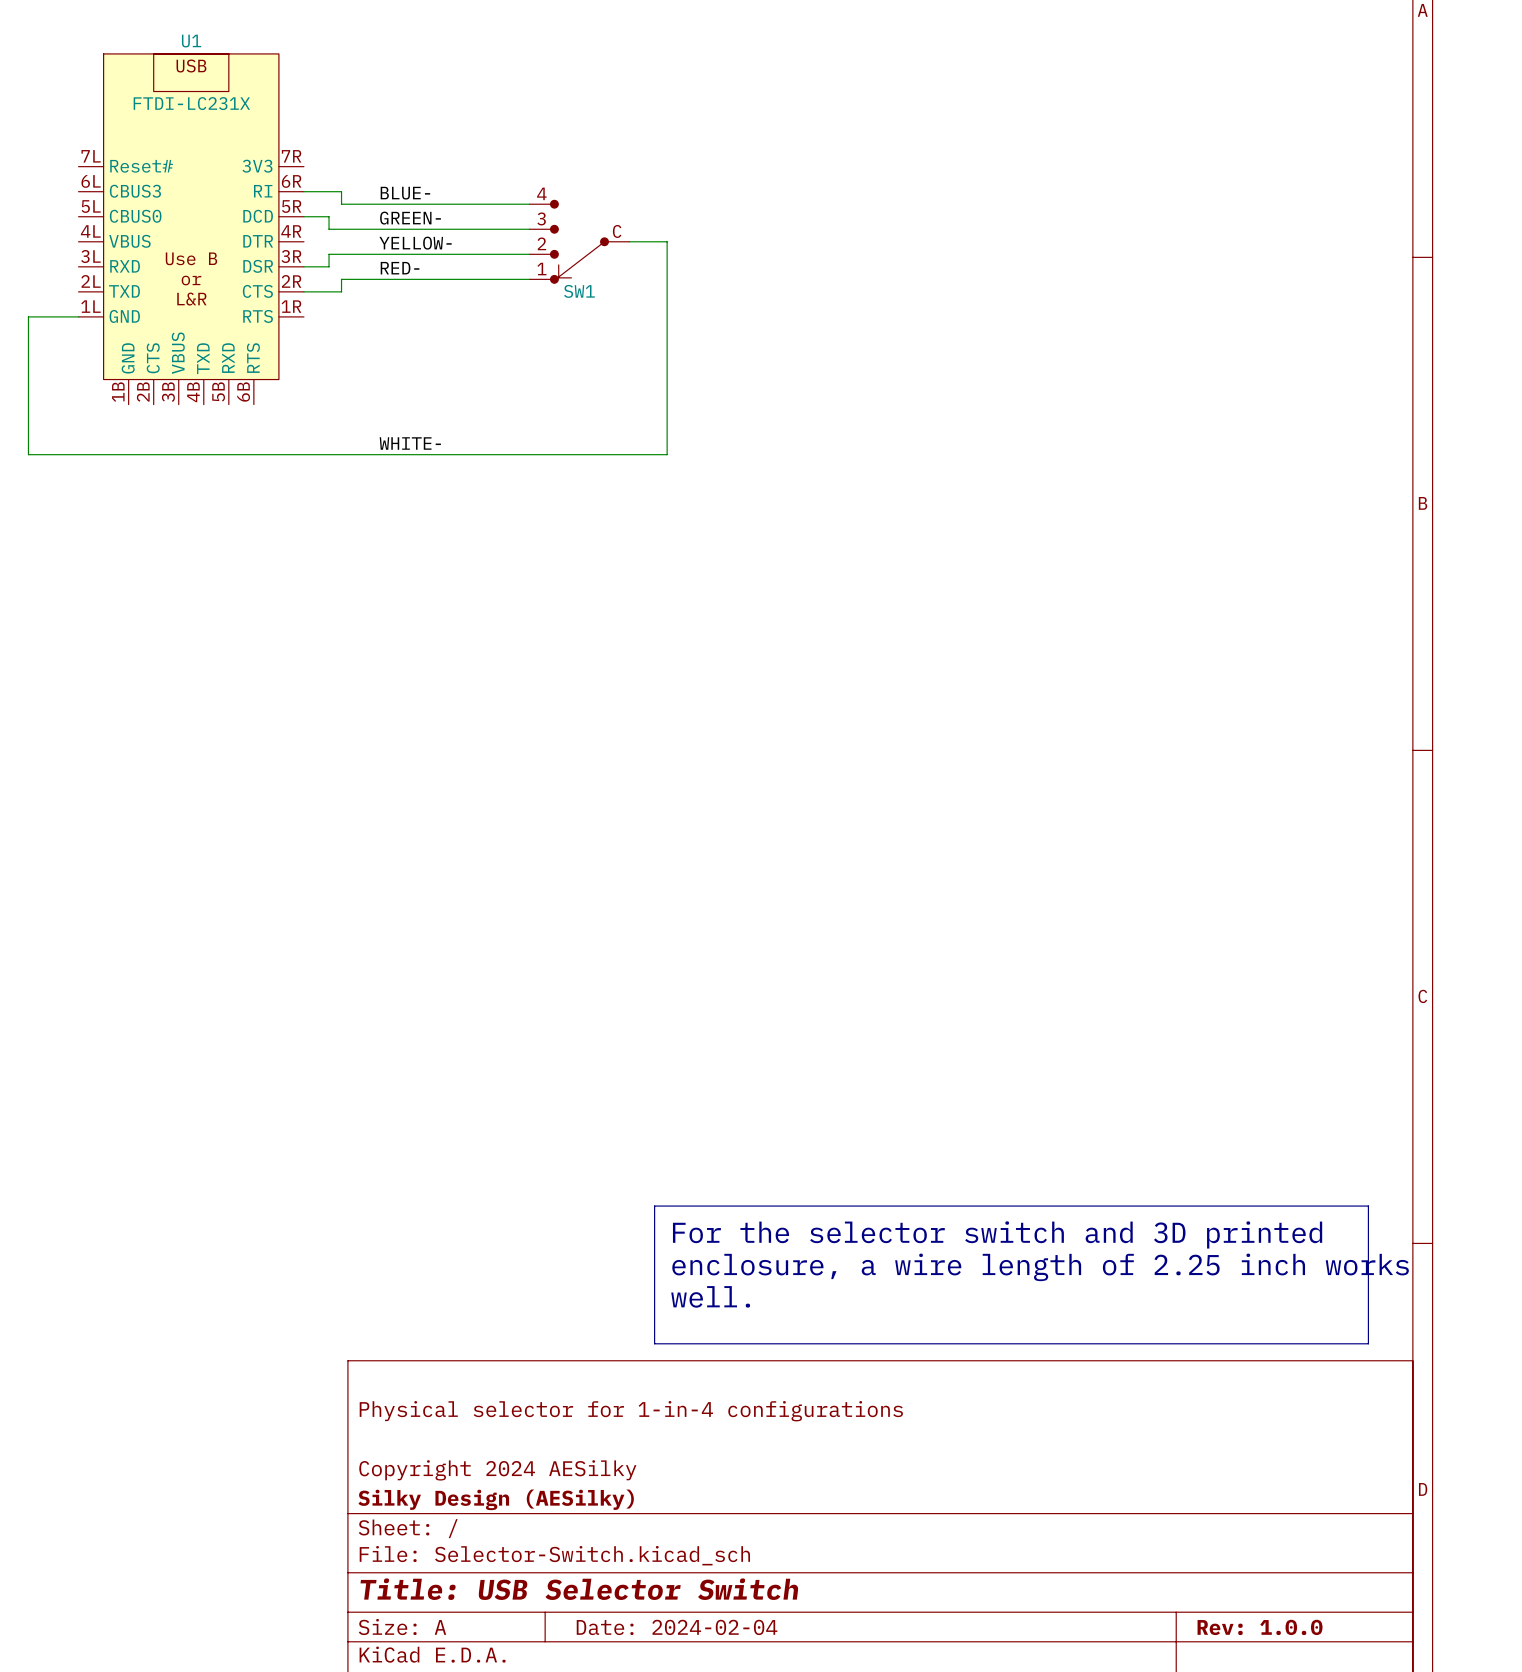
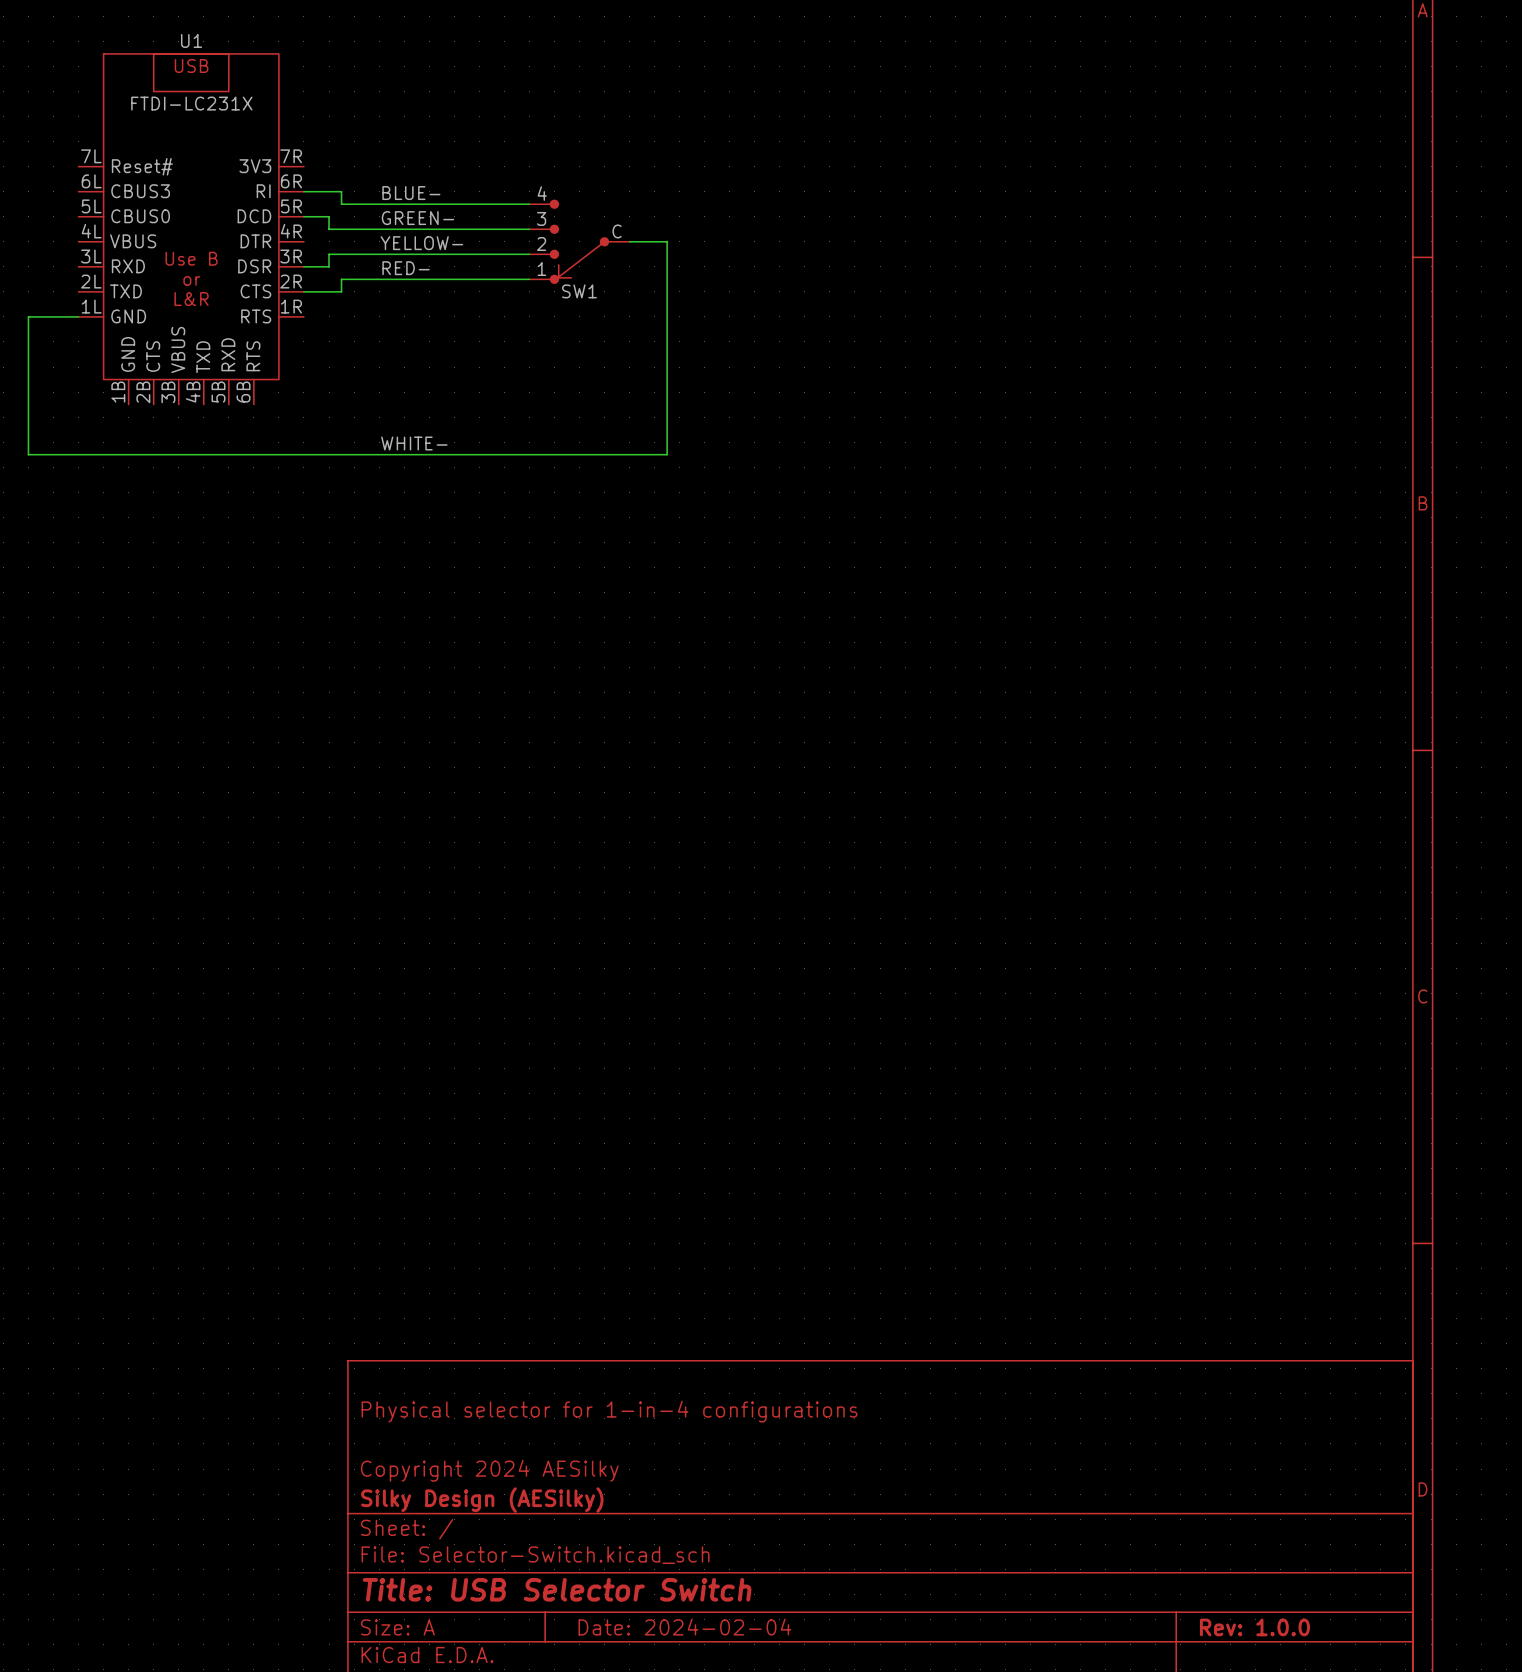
line: (654, 1206) (1368, 1206) (1368, 1343) (654, 1343) (654, 1206) -> none
text: For the selector switch and 3D printed (997, 1234) -> none
text: enclosure, a wire length of 2.25 inch works (1040, 1267) -> none
text: well. (710, 1296) -> none

